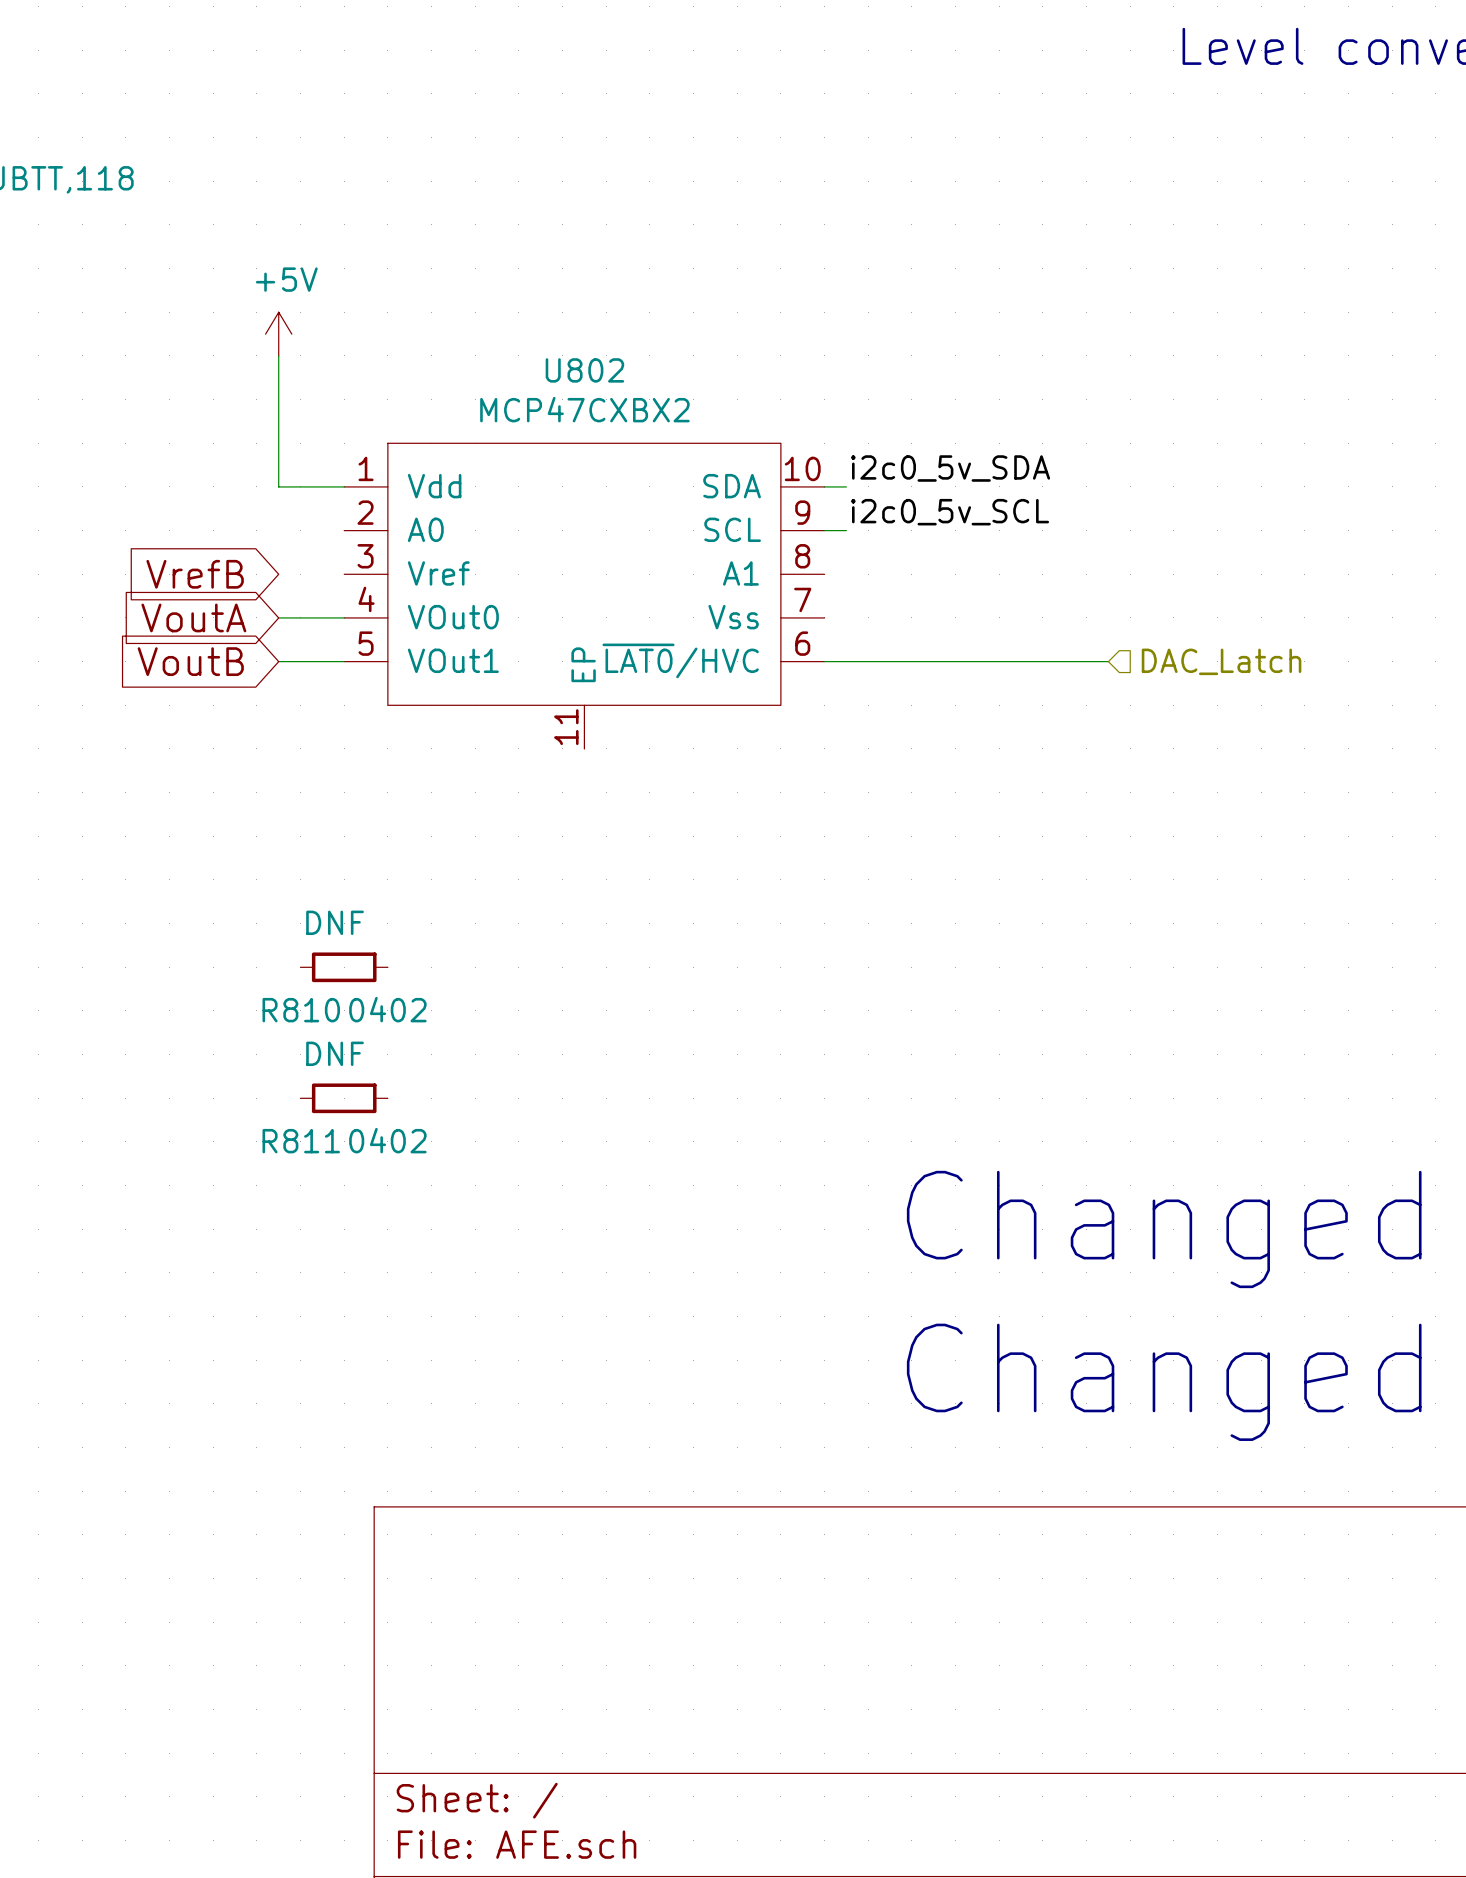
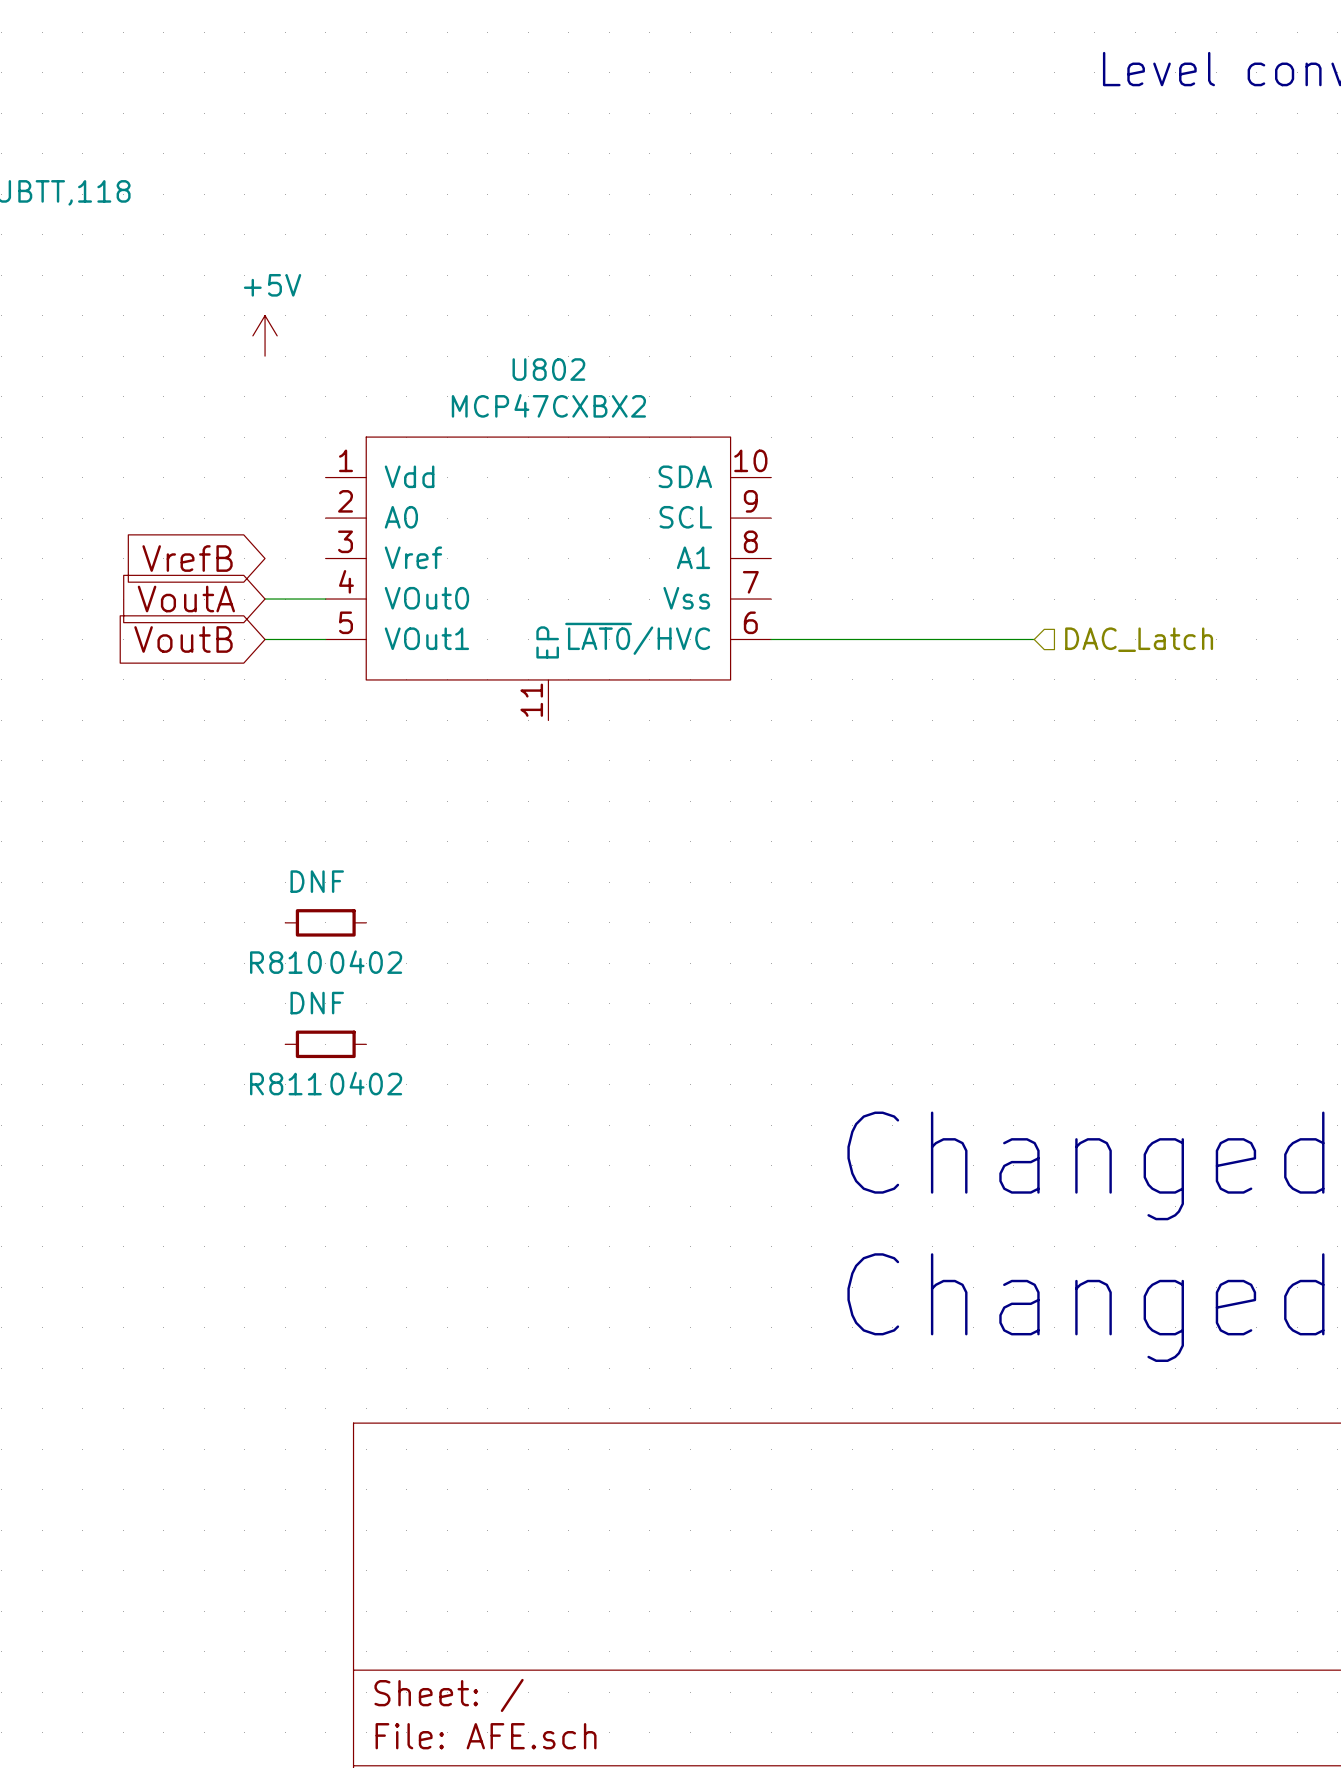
wire: (278, 355) (278, 486) (344, 486) -> none
label: i2c0_5v_SDA (950, 468) -> none
wire: (824, 486) (846, 486) -> none
label: i2c0_5v_SCL (950, 512) -> none
wire: (824, 530) (846, 530) -> none

